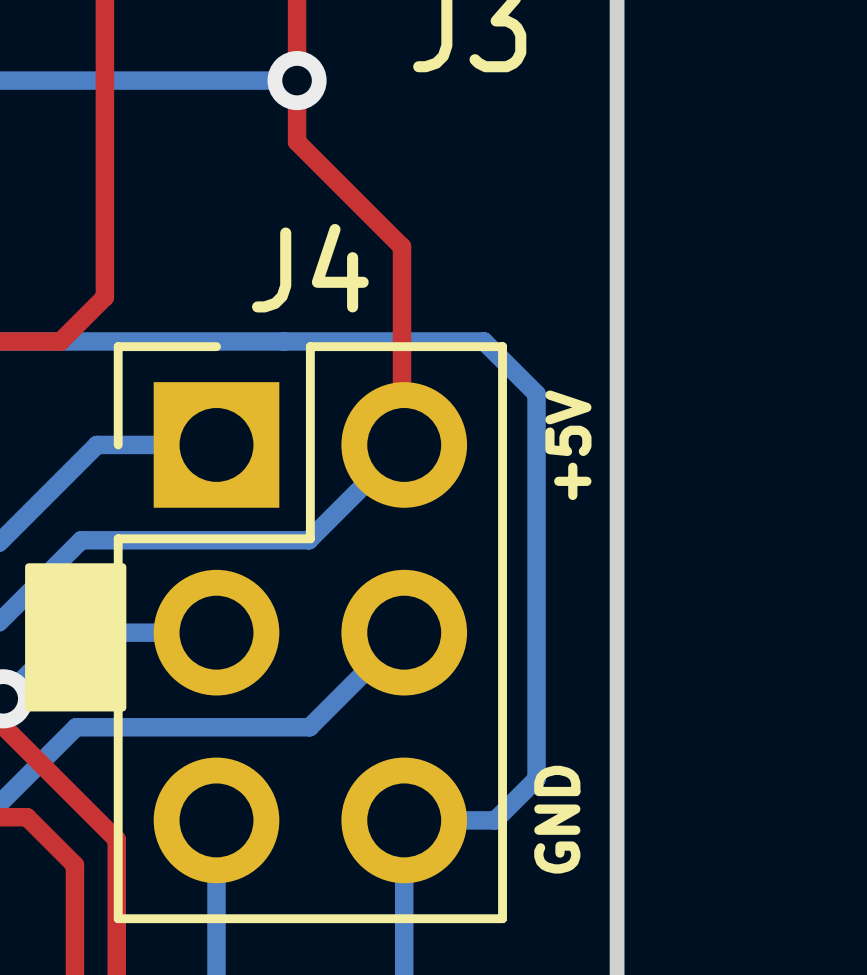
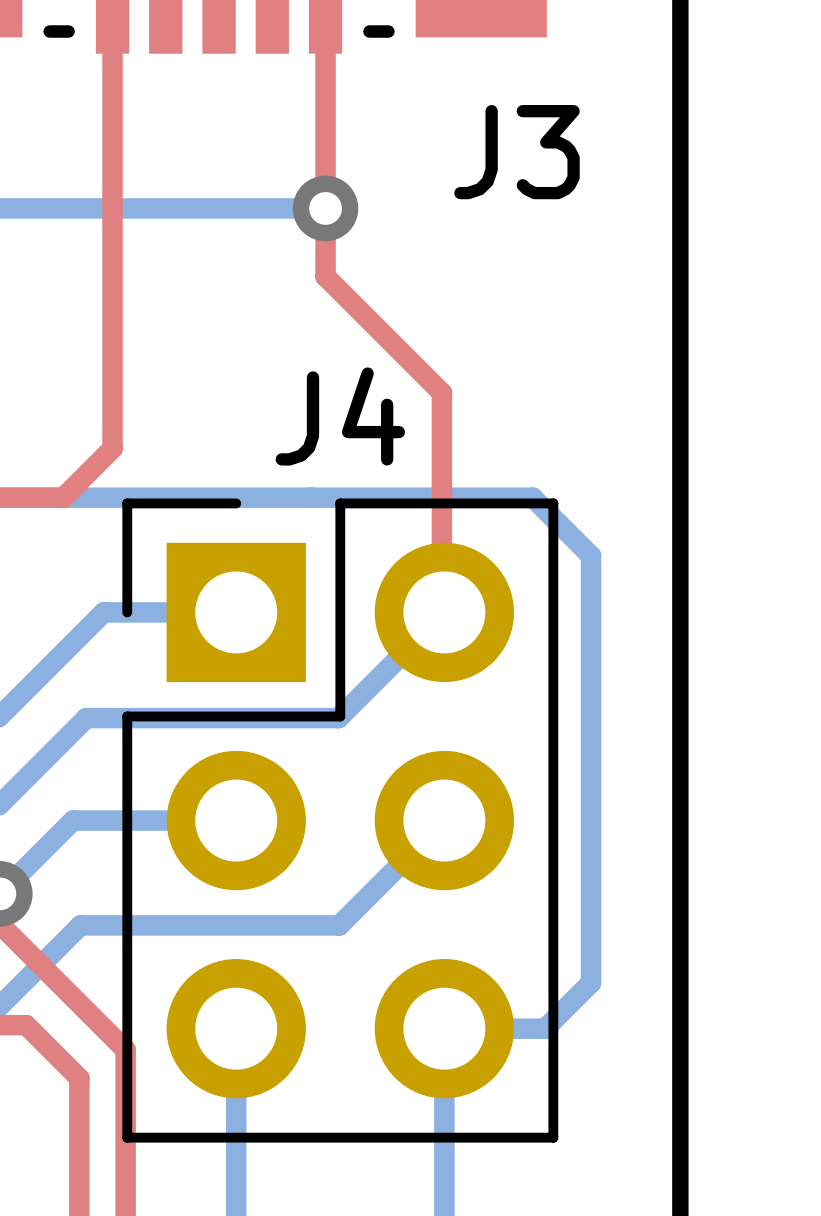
J4 footprint: [25, 342, 507, 924] -> [122, 498, 559, 1143]
text: +5V (568, 445) -> none
text: GND (557, 819) -> none

